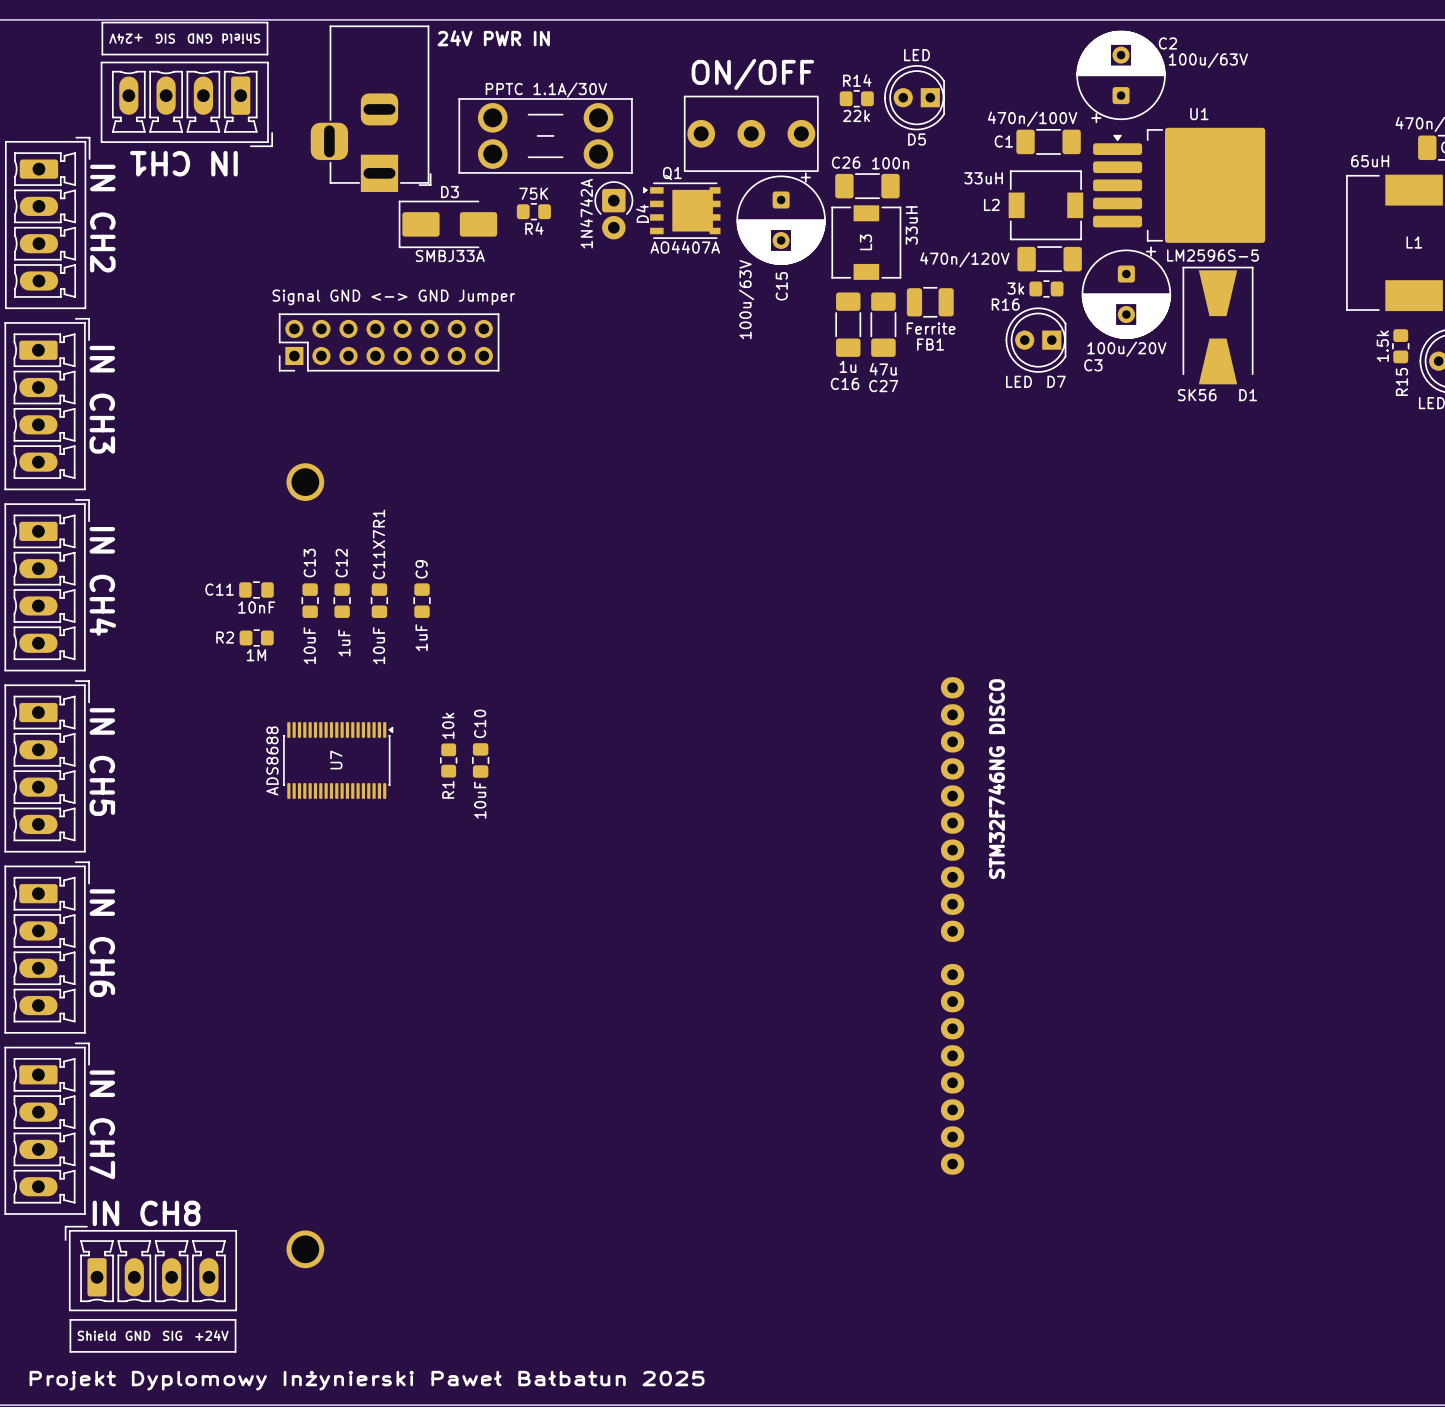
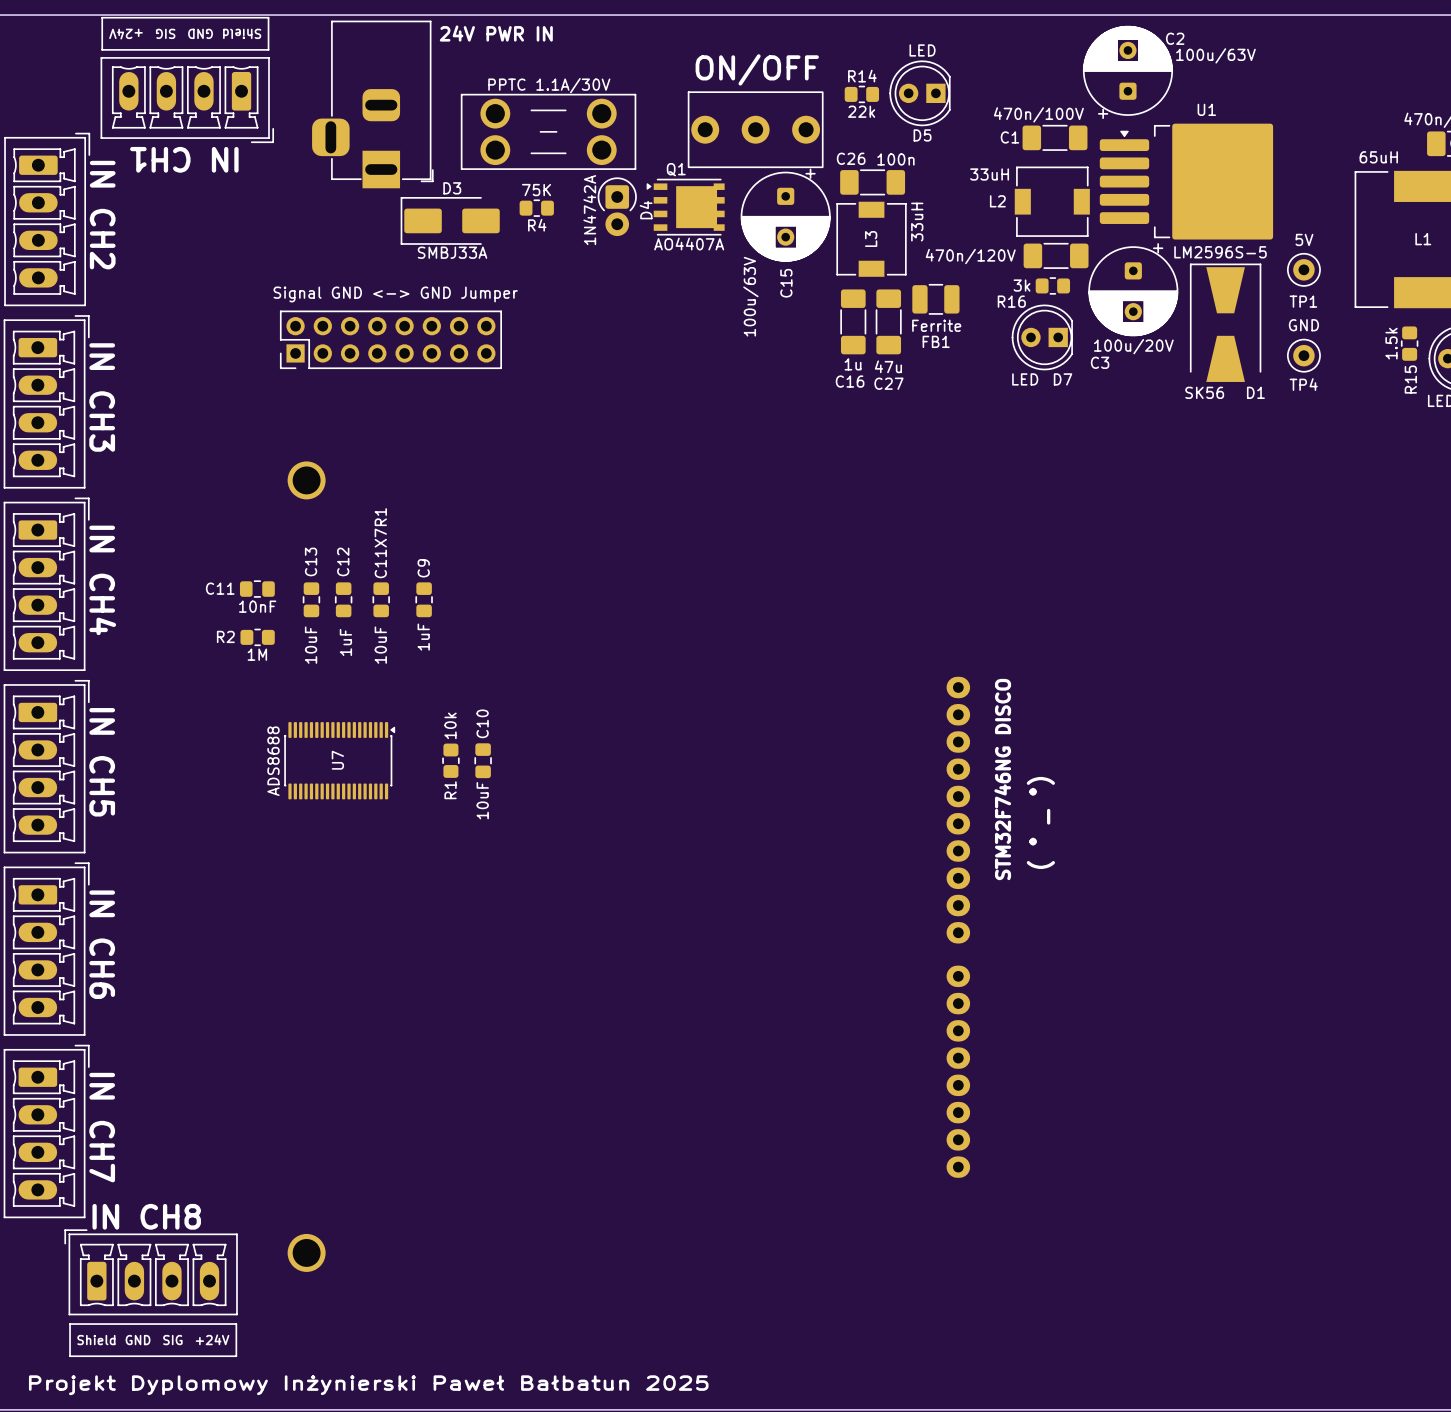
TP1: none -> 5V (1303, 269)
TP4: none -> GND (1303, 355)
text: none -> ( ° _ °) (1040, 822)

